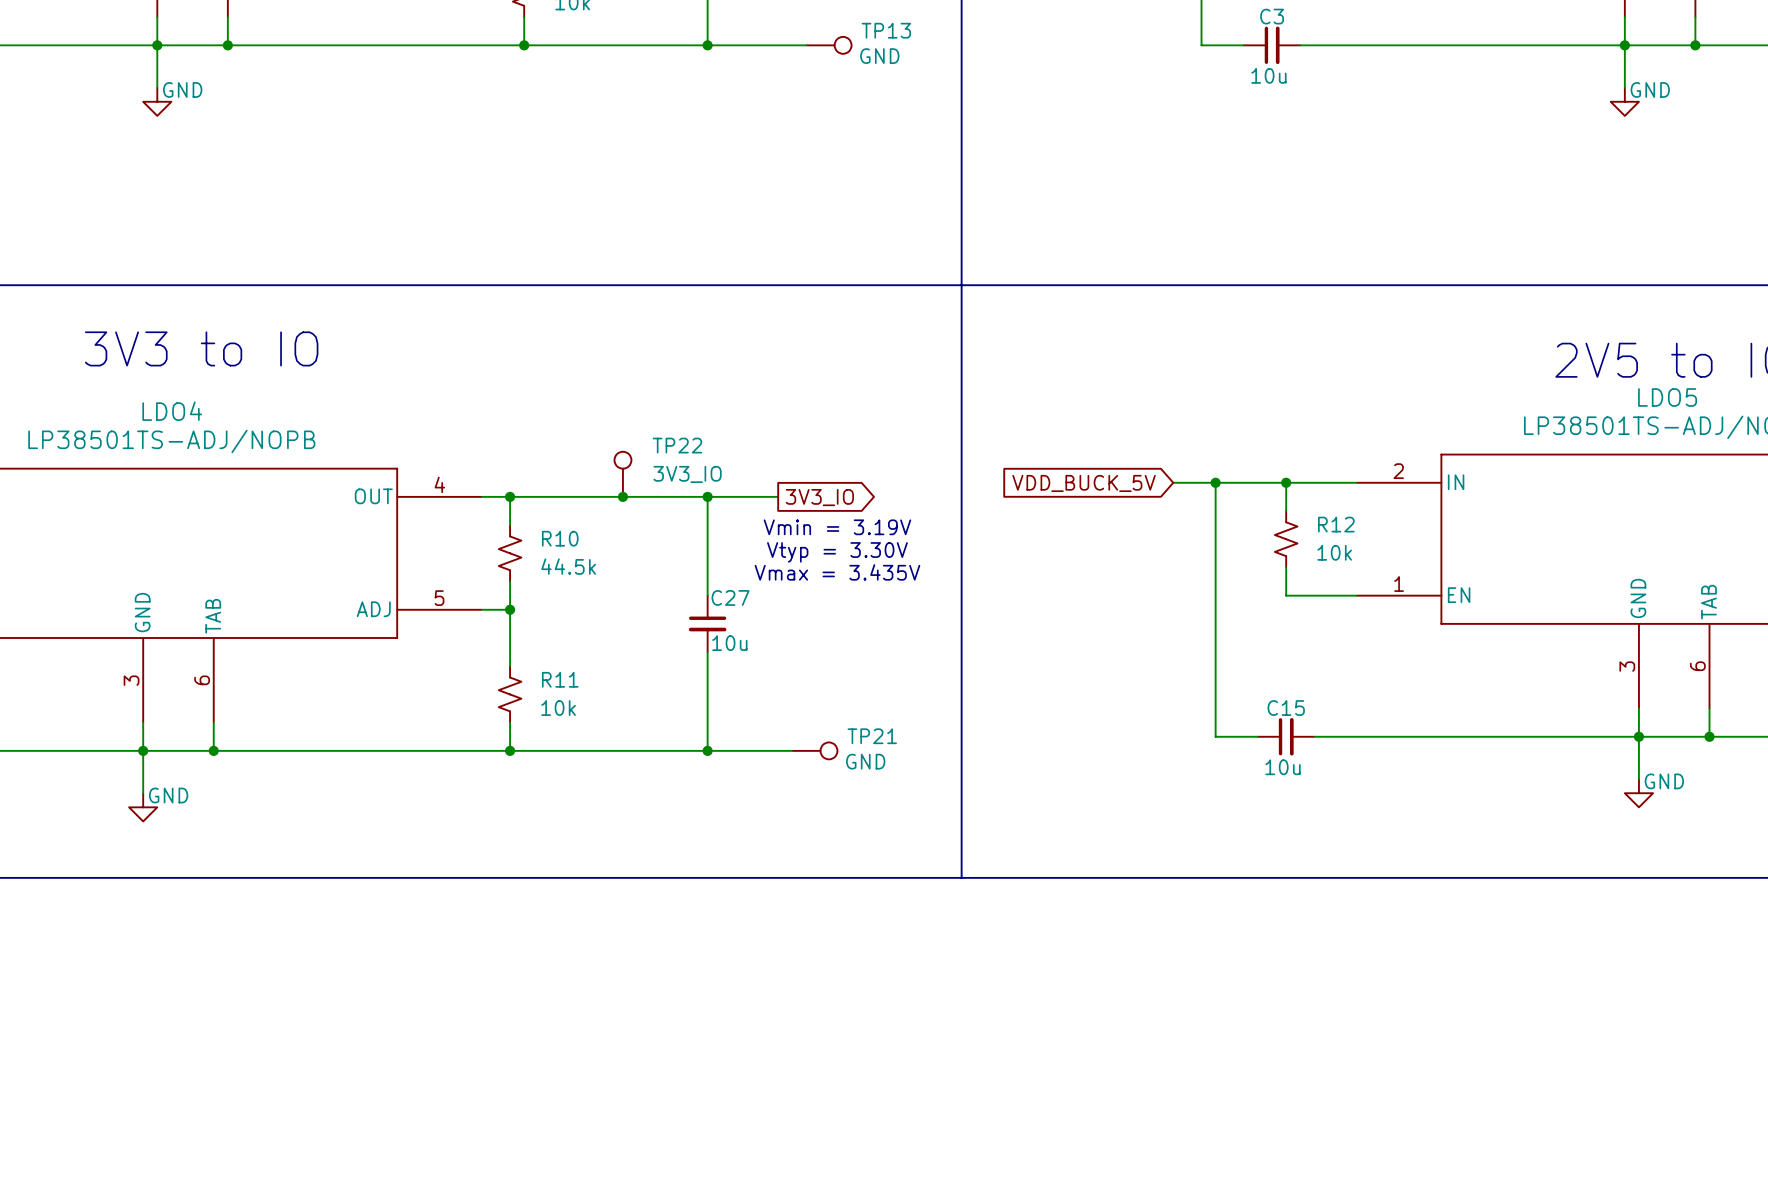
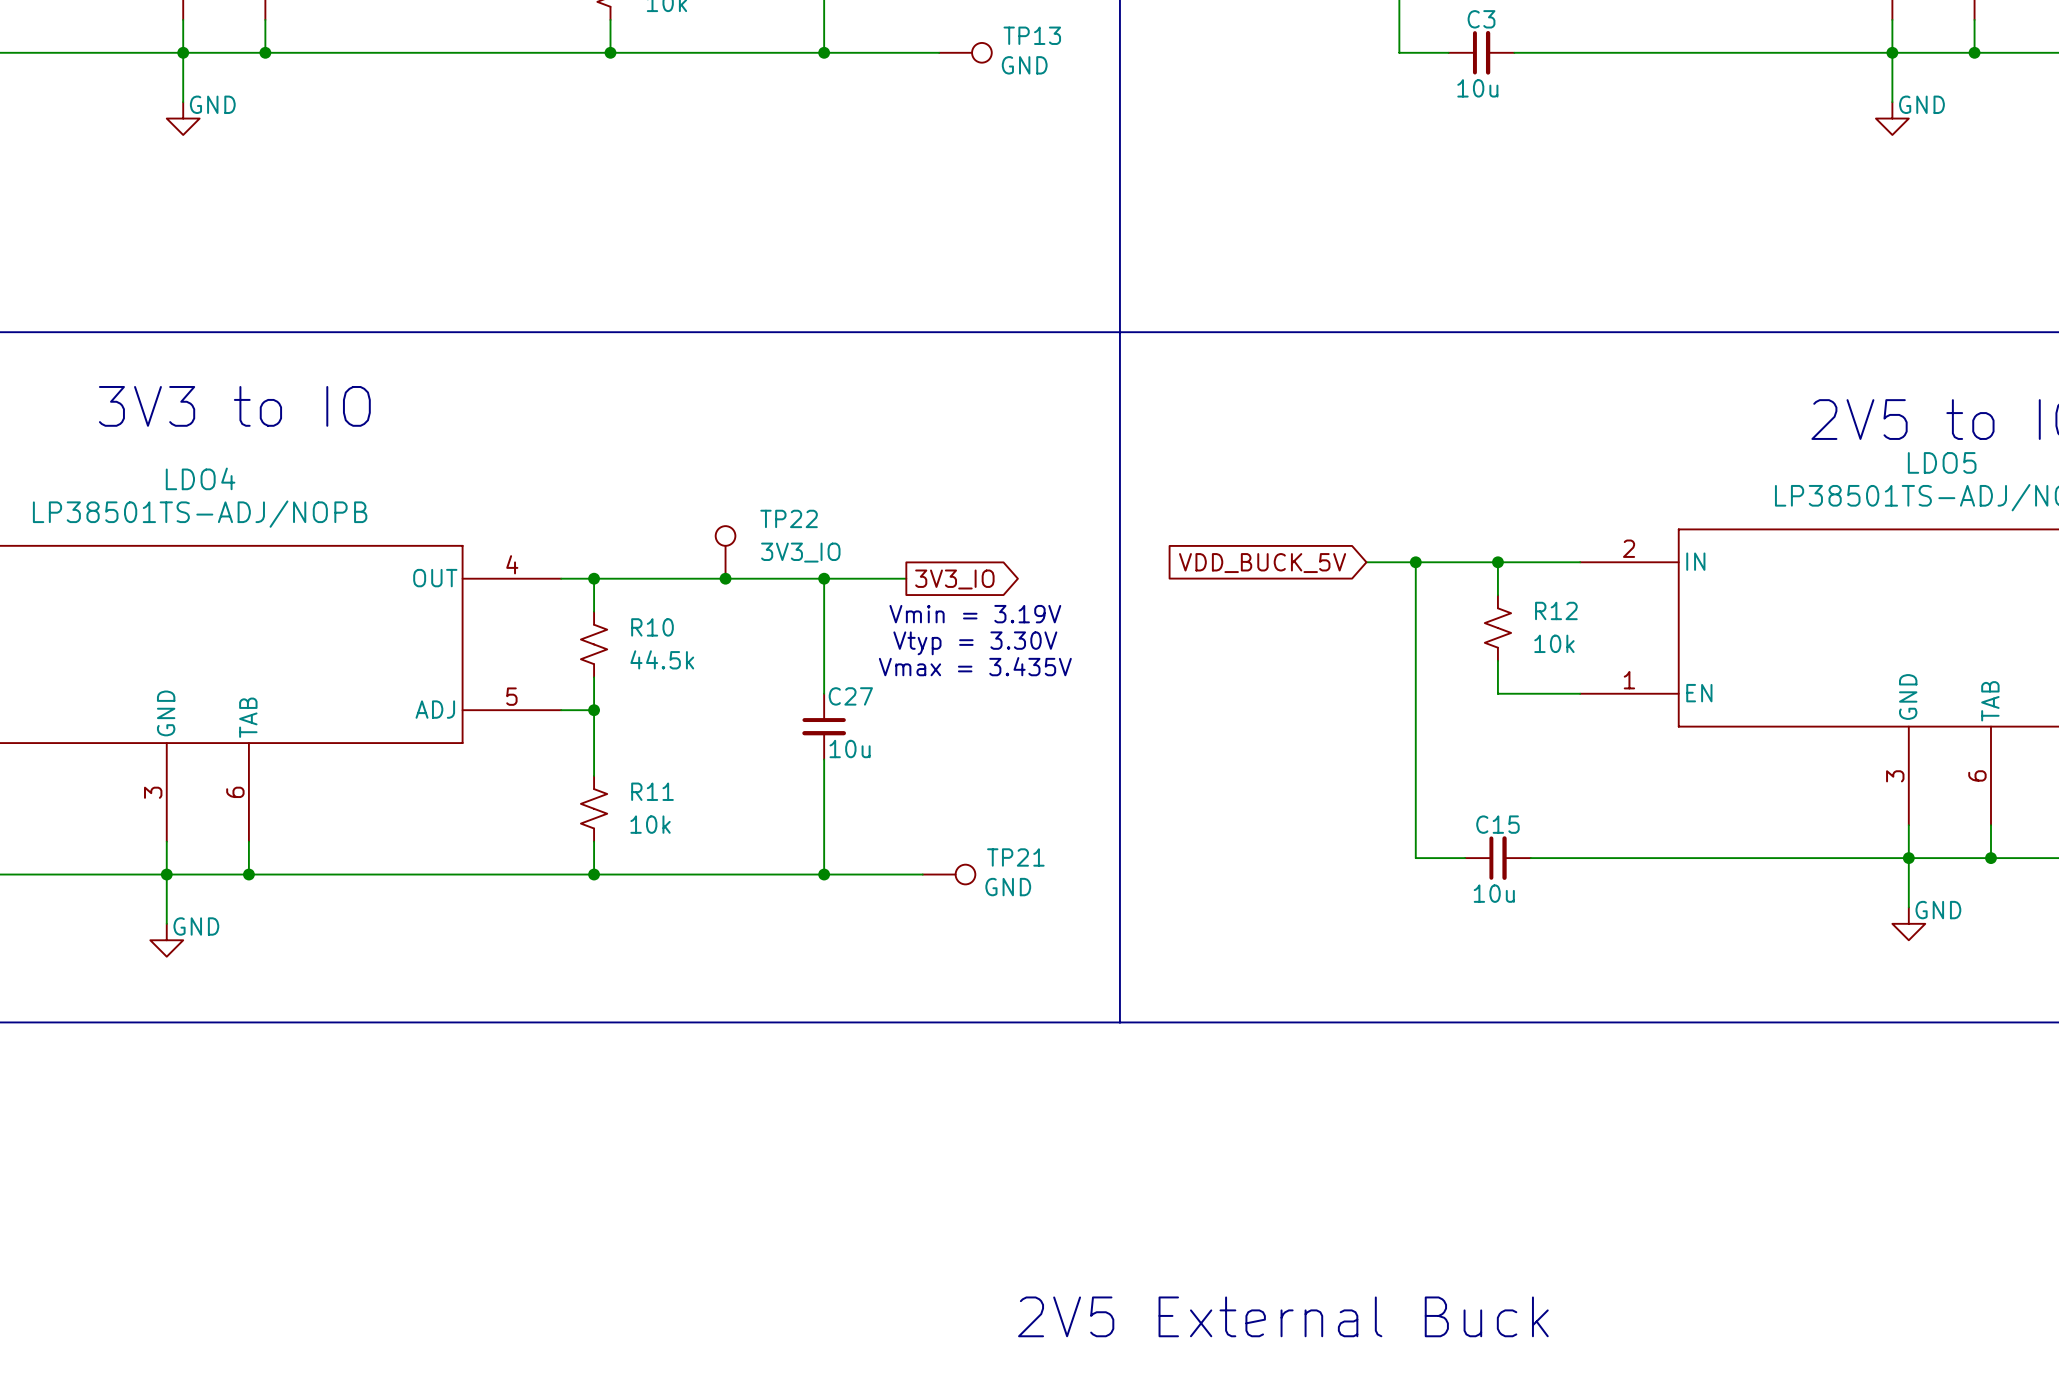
text: none -> 2V5 External Buck (1283, 1316)

